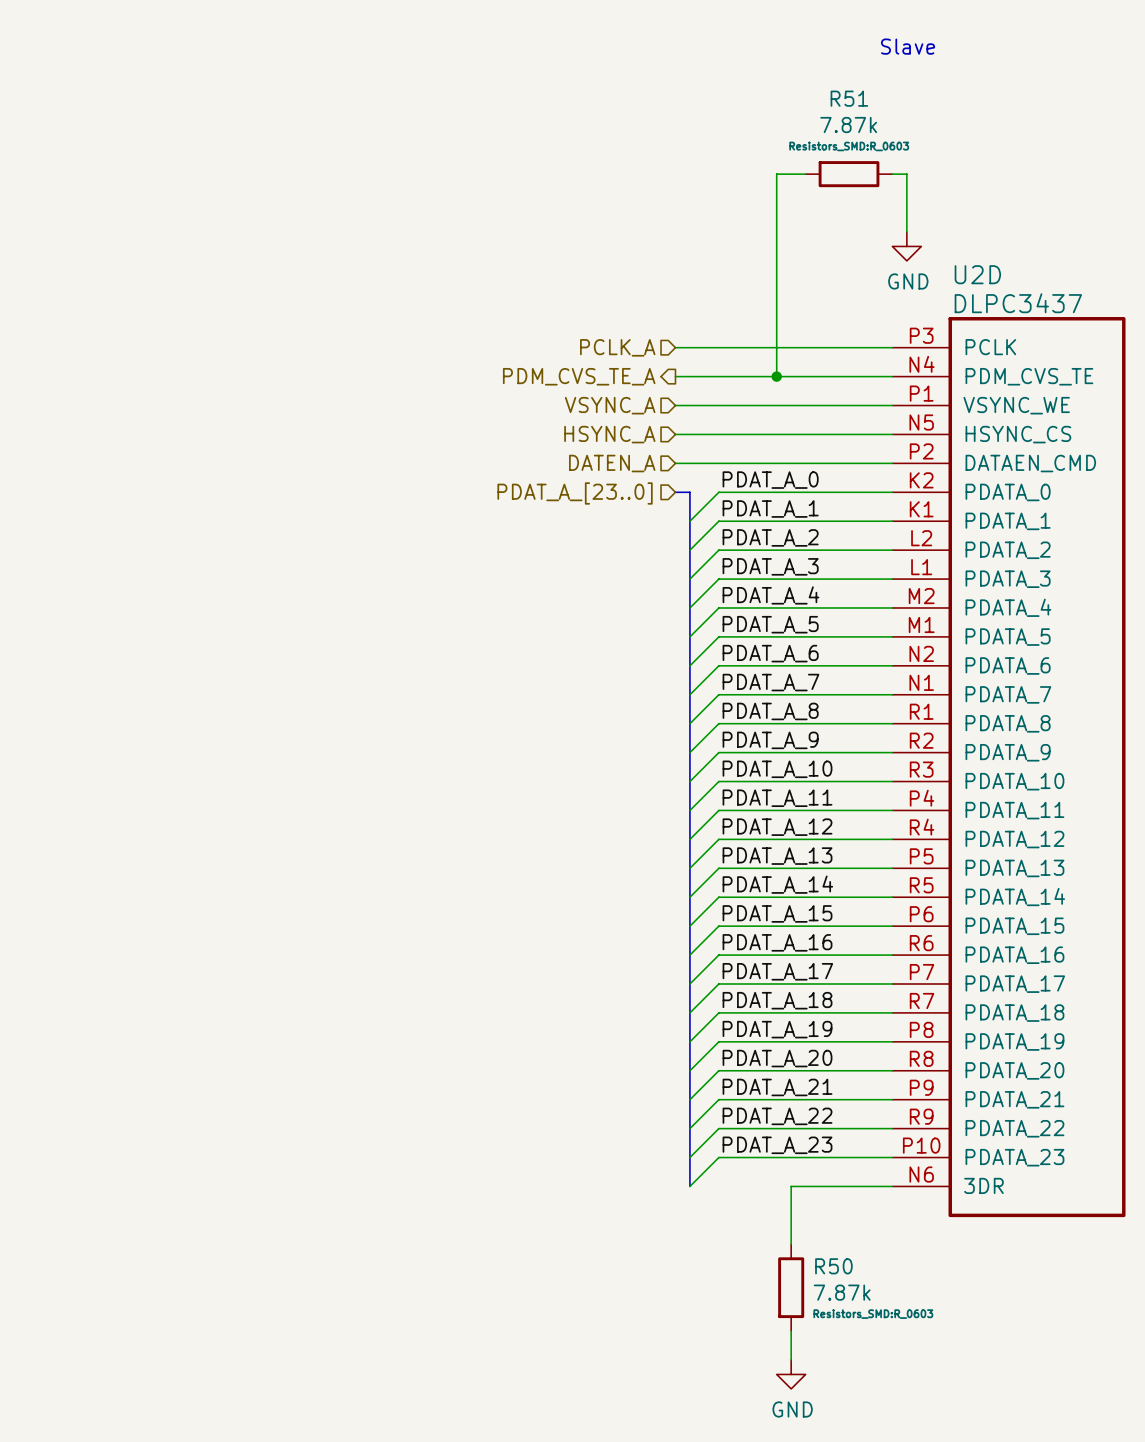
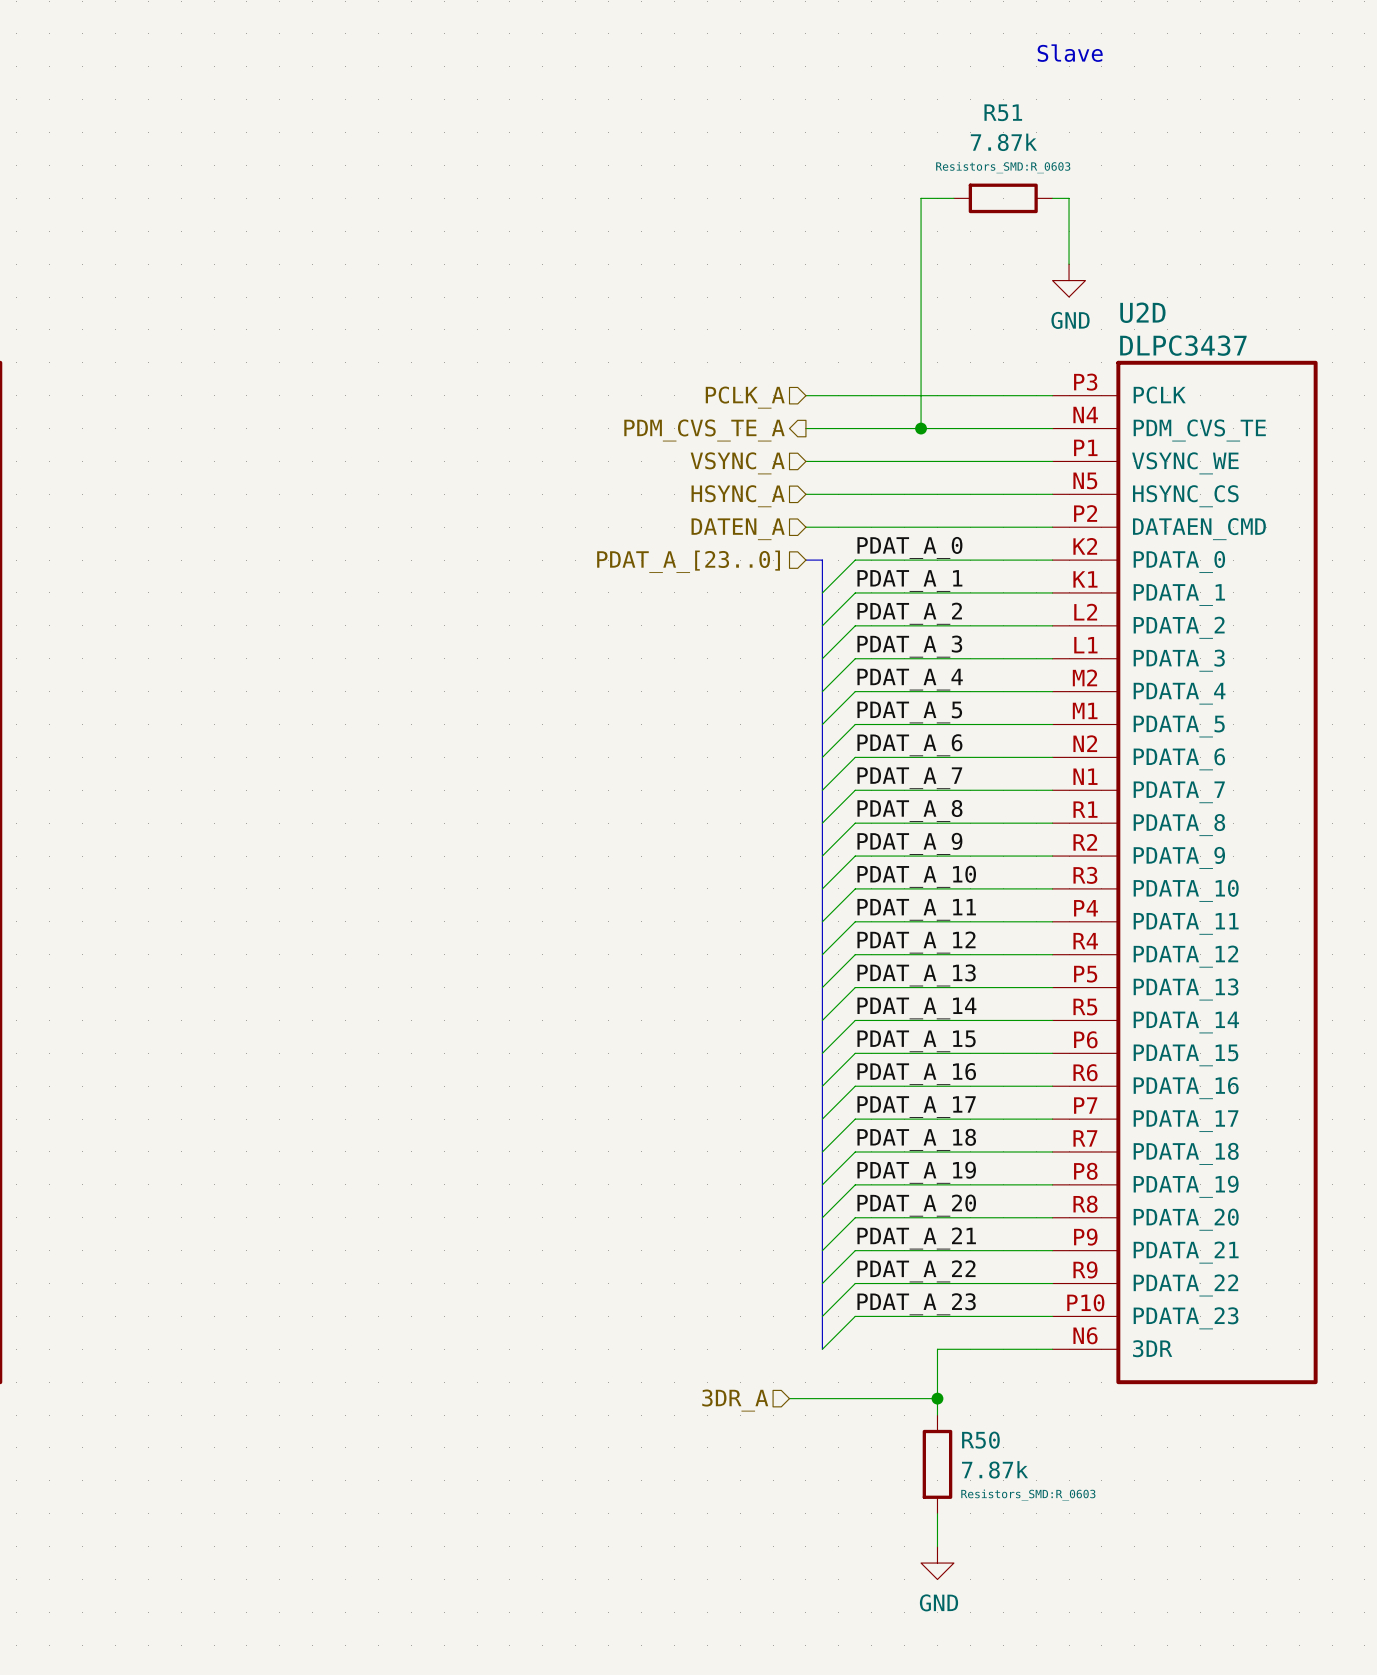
hierarchical label: none -> 3DR_A (735, 1400)
wire: none -> (789, 1398) (937, 1398)
junction: none -> (937, 1398)

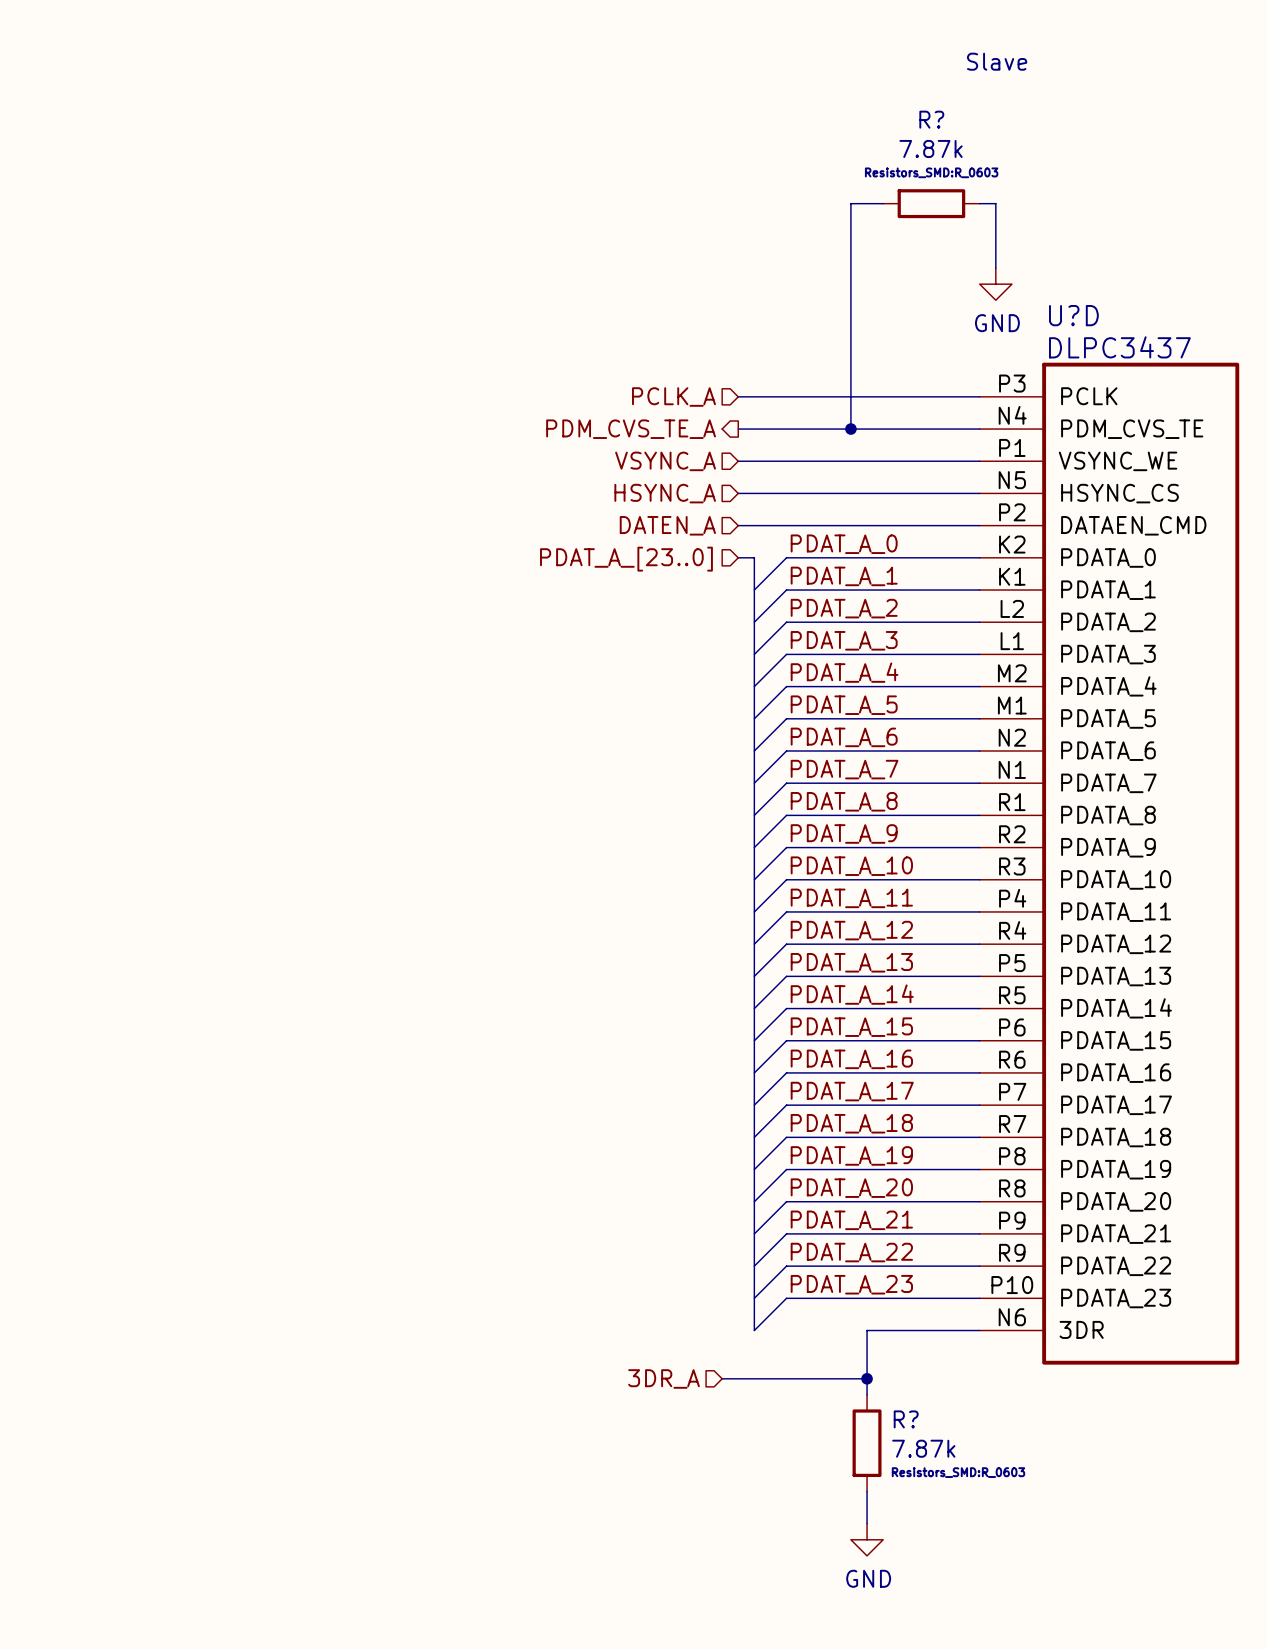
R51 name: R51 (1003, 112) -> R? (931, 119)
U2D name: U2D (1142, 312) -> U?D (1073, 315)
R50 name: R50 (980, 1440) -> R? (906, 1419)

